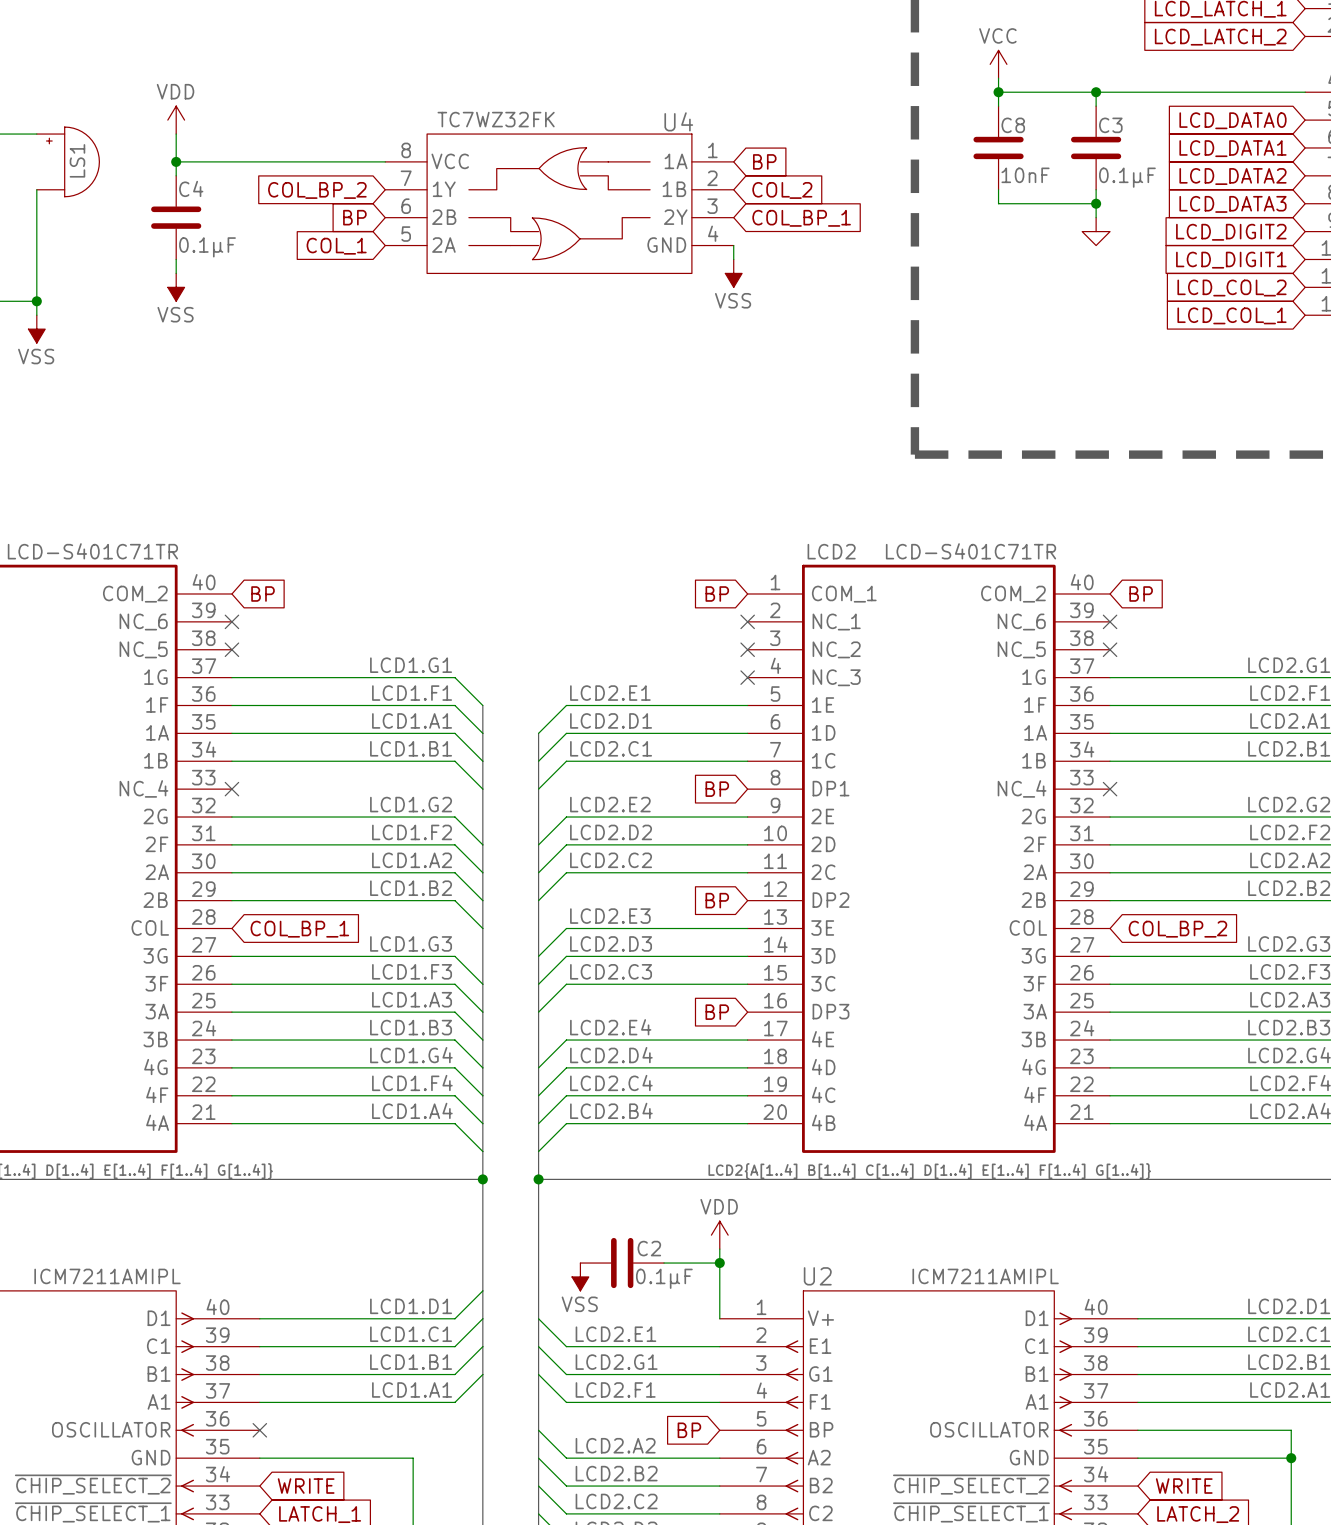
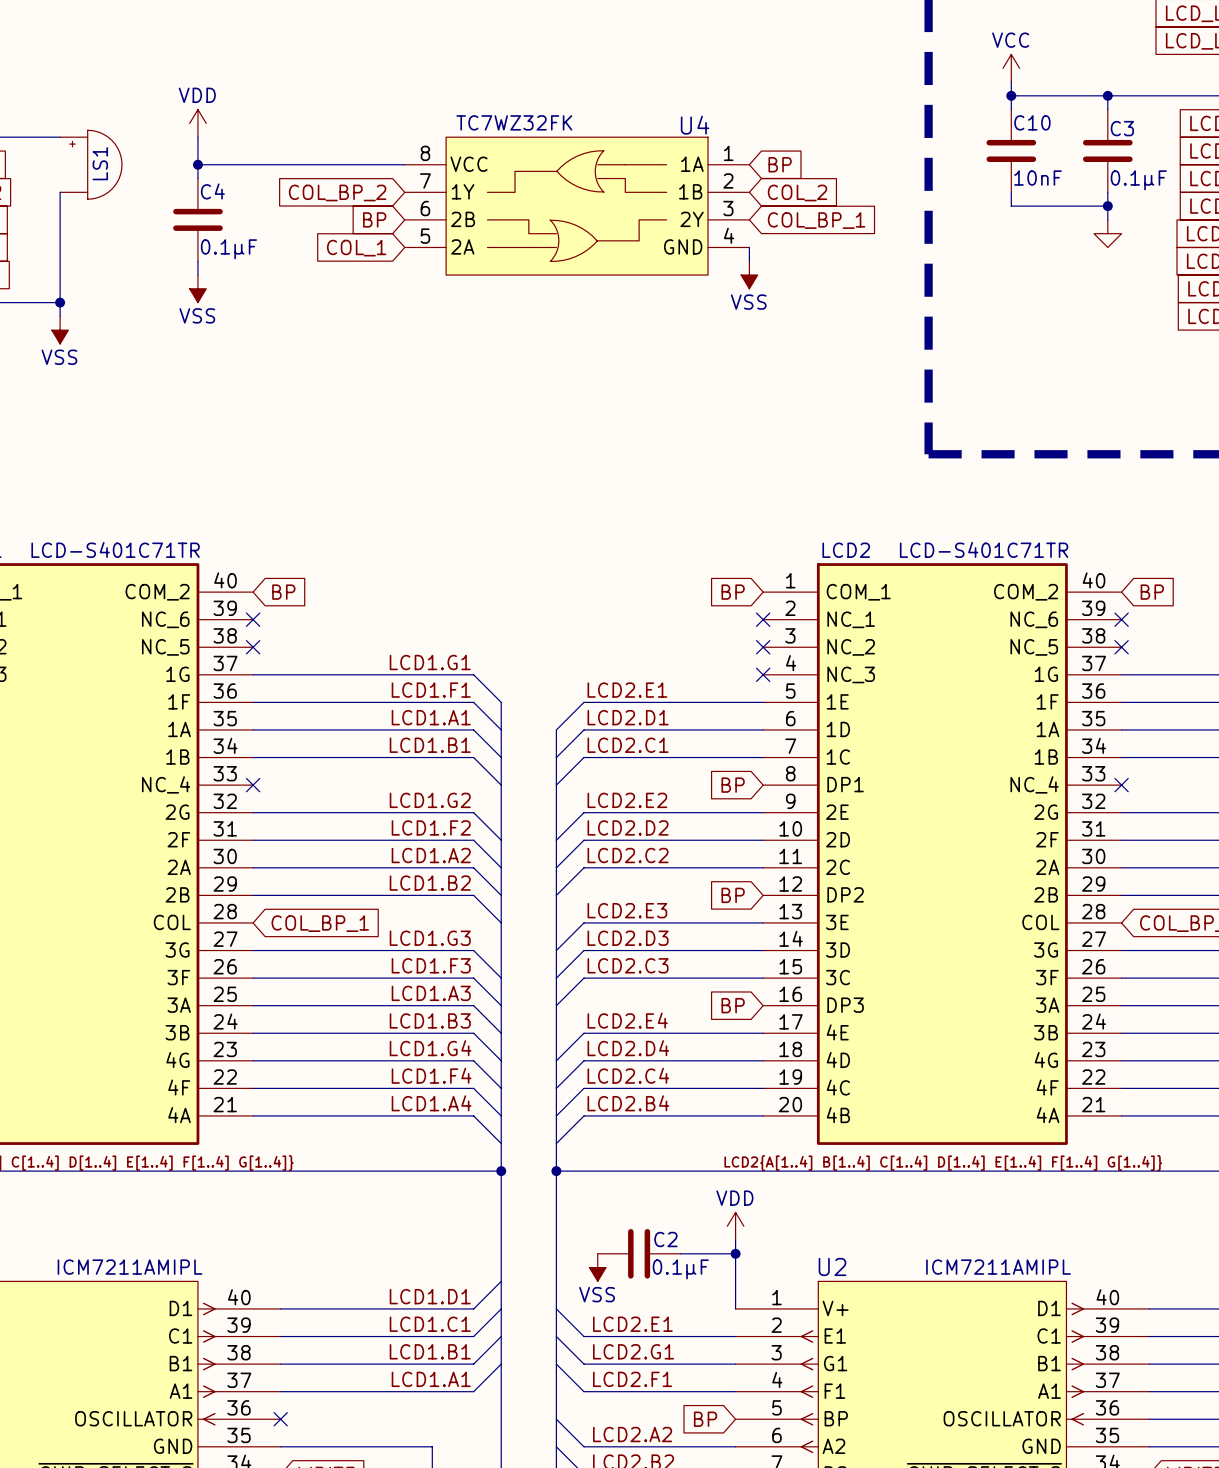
C8 name: C8 (1013, 125) -> C10 (1032, 122)

